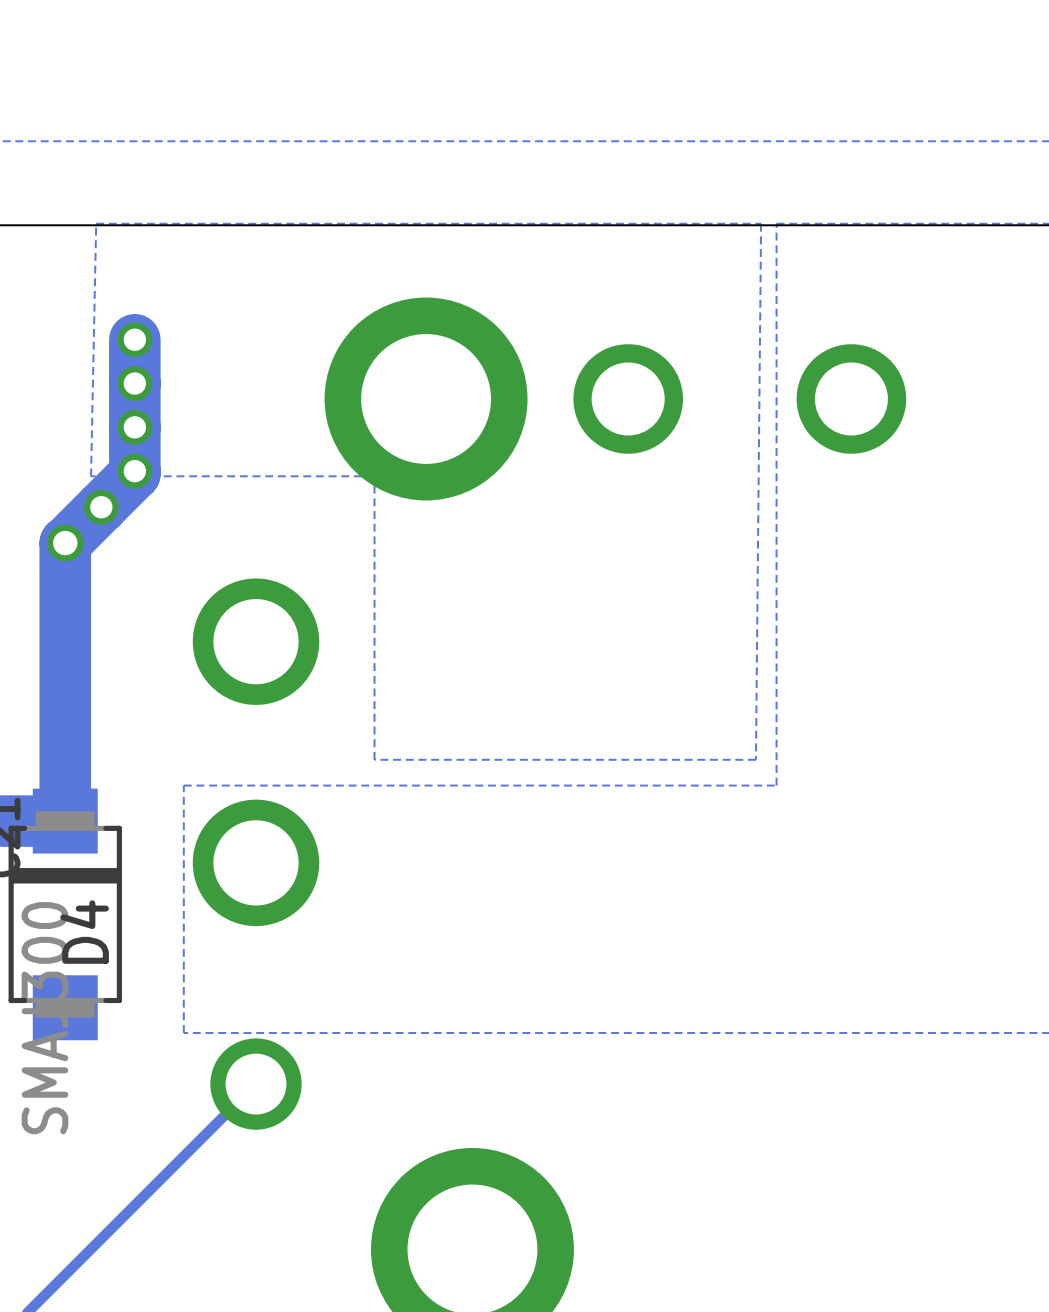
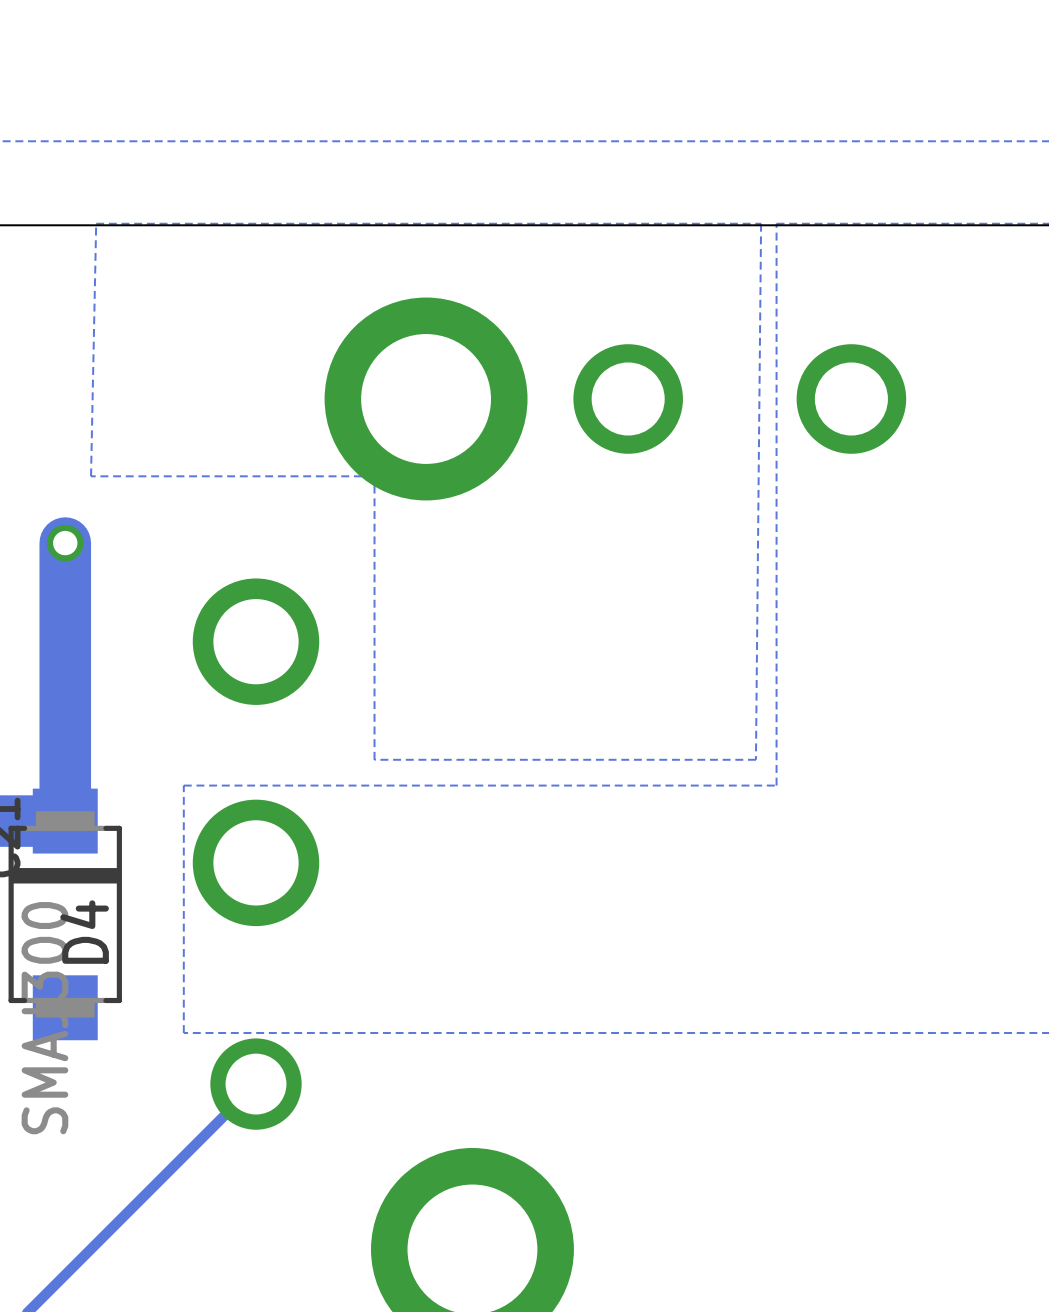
track: (134, 339) (134, 473) (65, 543) -> none
via: (134, 339) -> none
via: (134, 383) -> none
via: (134, 427) -> none
via: (134, 471) -> none
via: (101, 507) -> none

